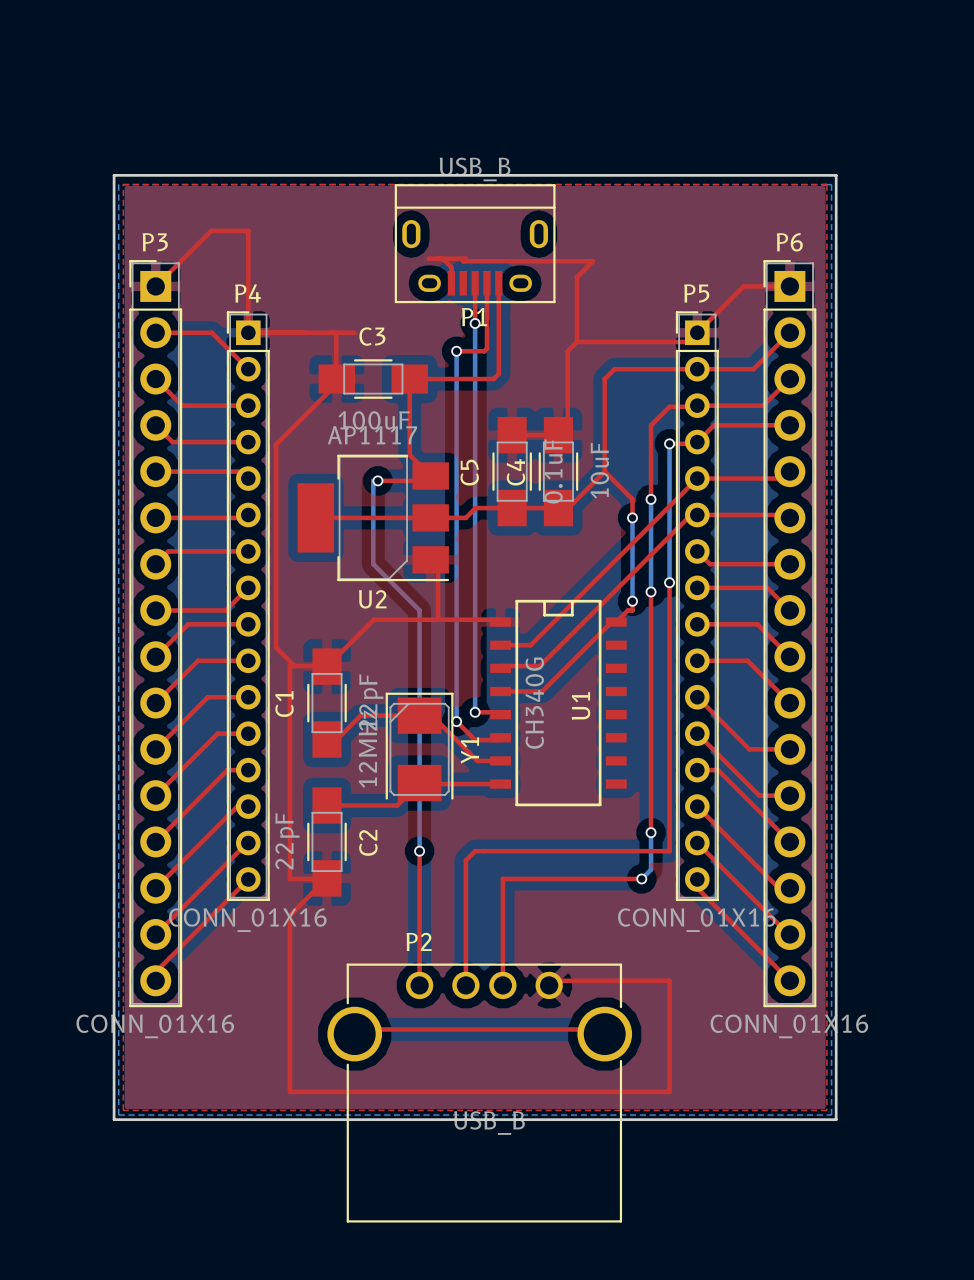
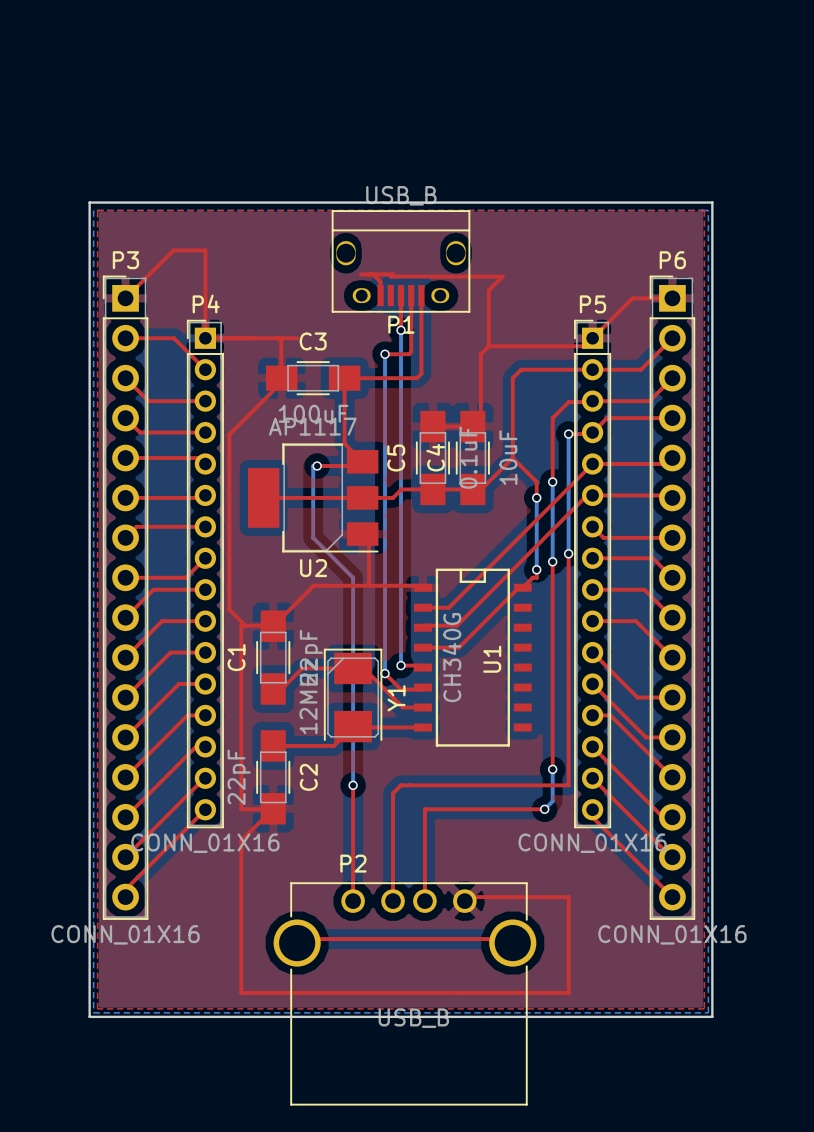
P1 footprint: [394, 184, 556, 304] -> [331, 210, 471, 313]

